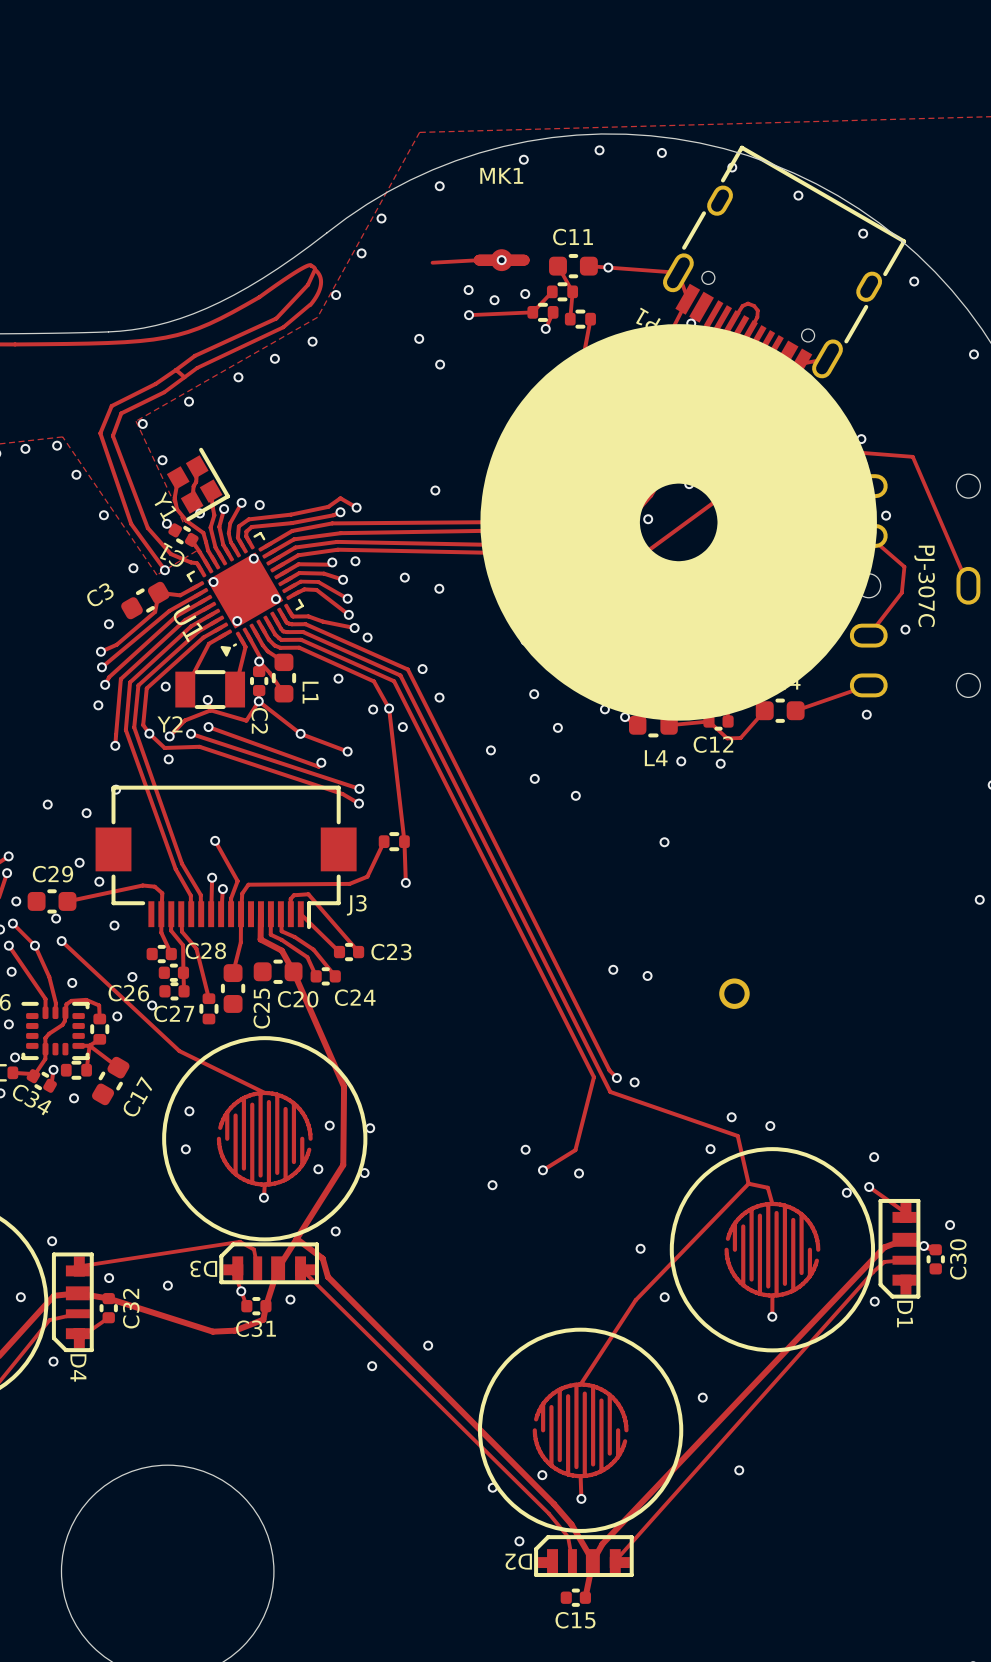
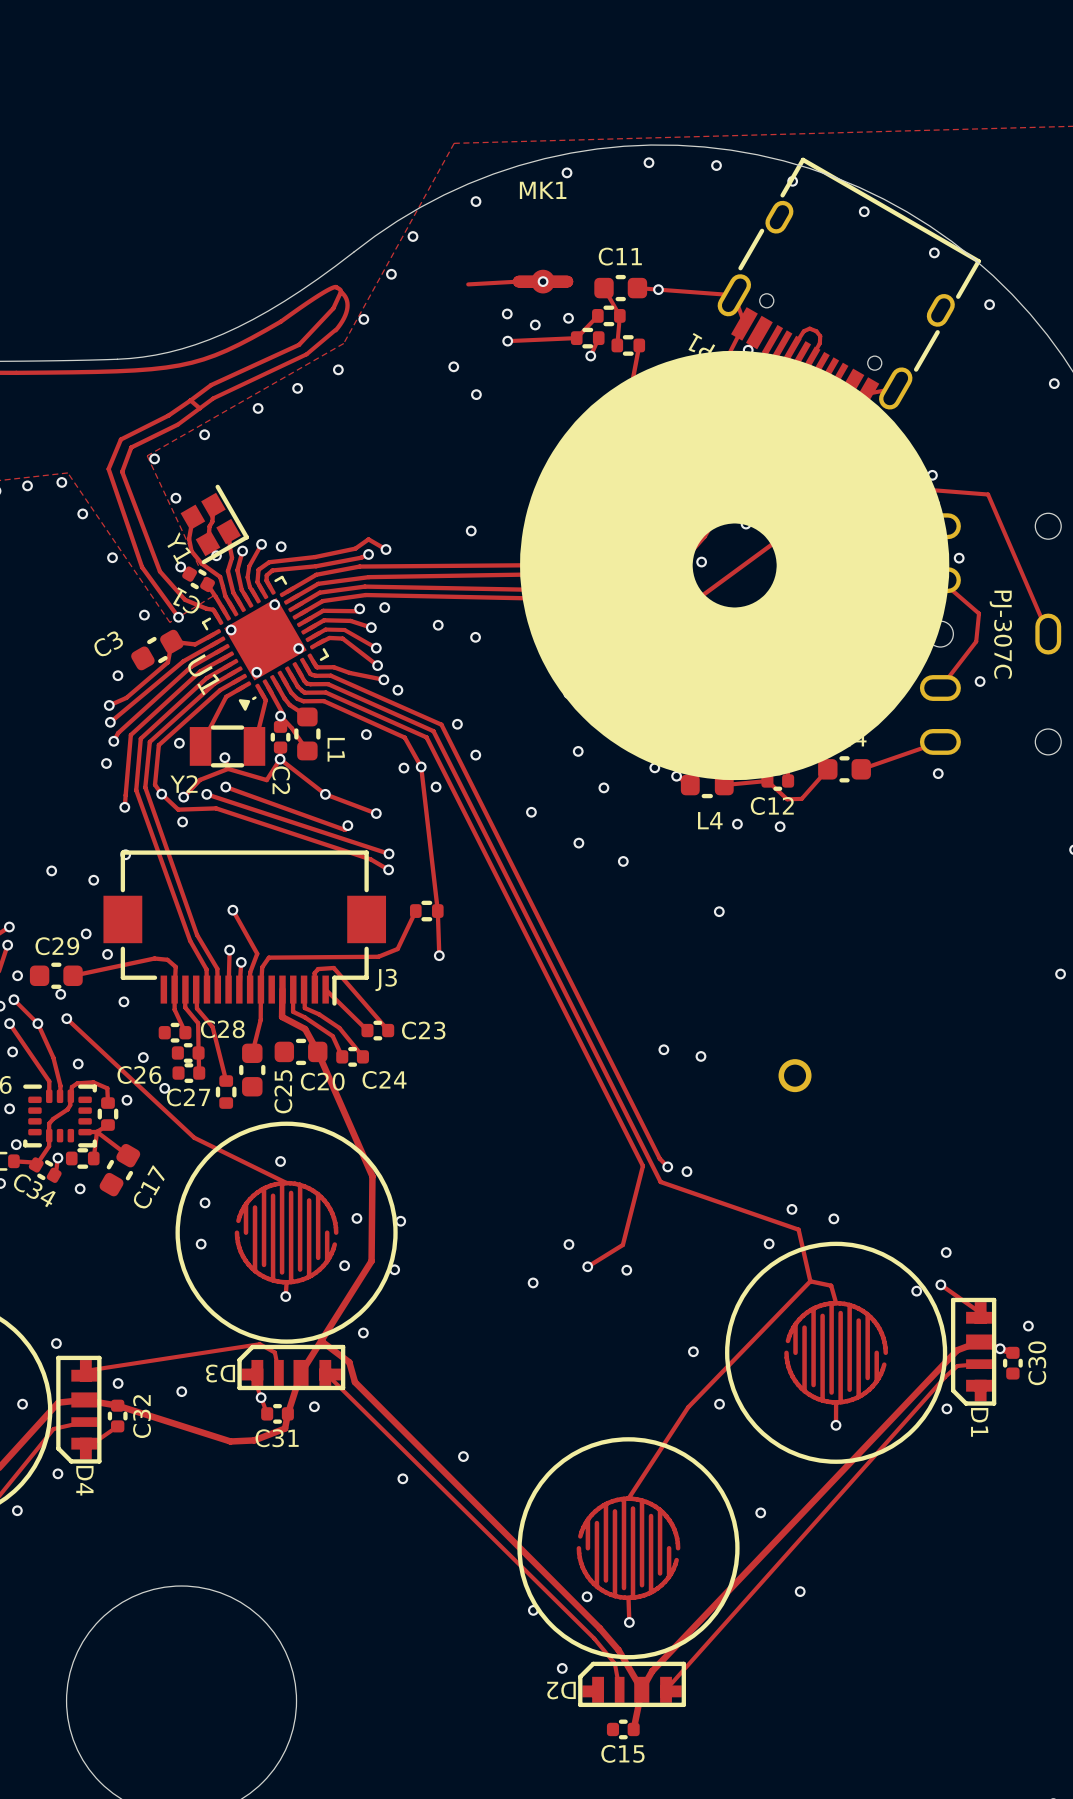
via: none -> (280, 1161)
via: none -> (17, 1510)

